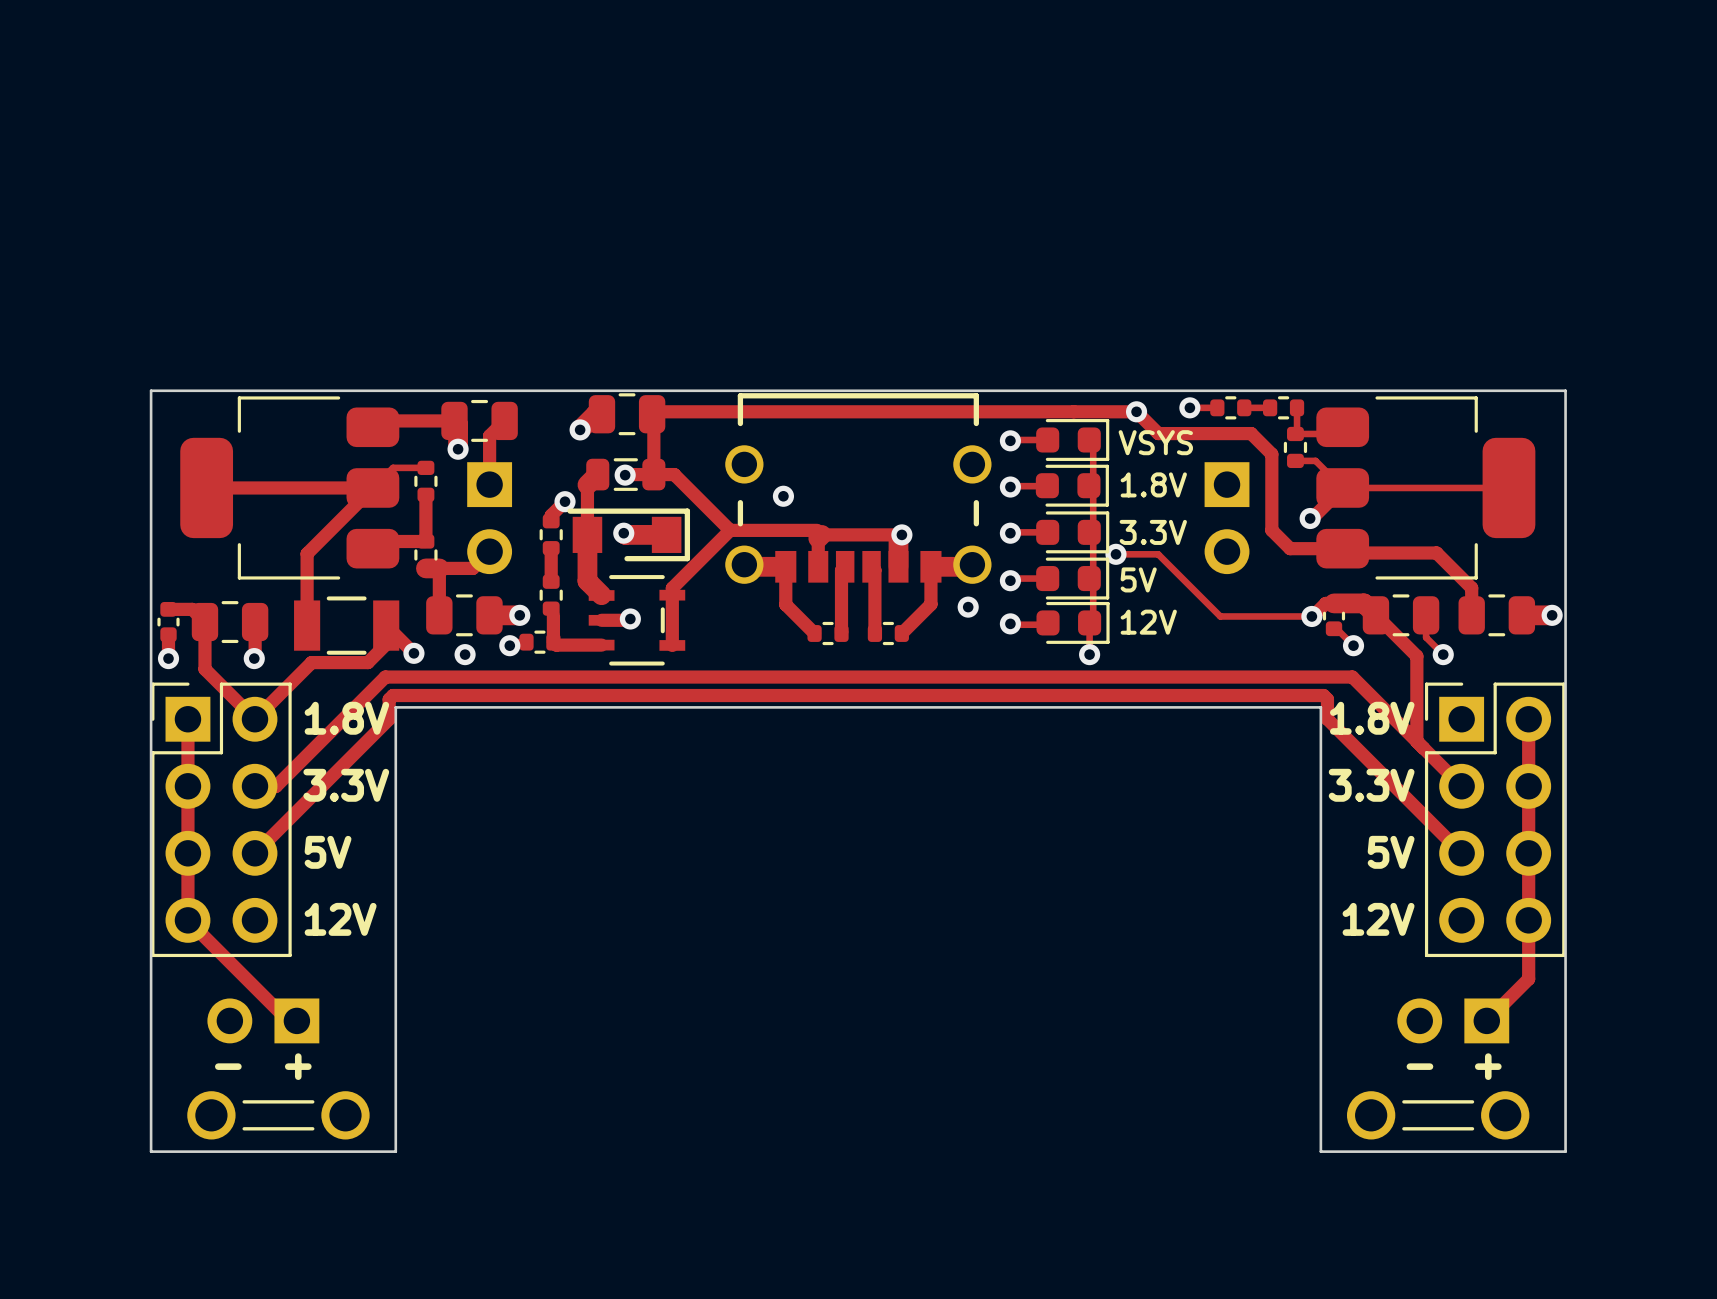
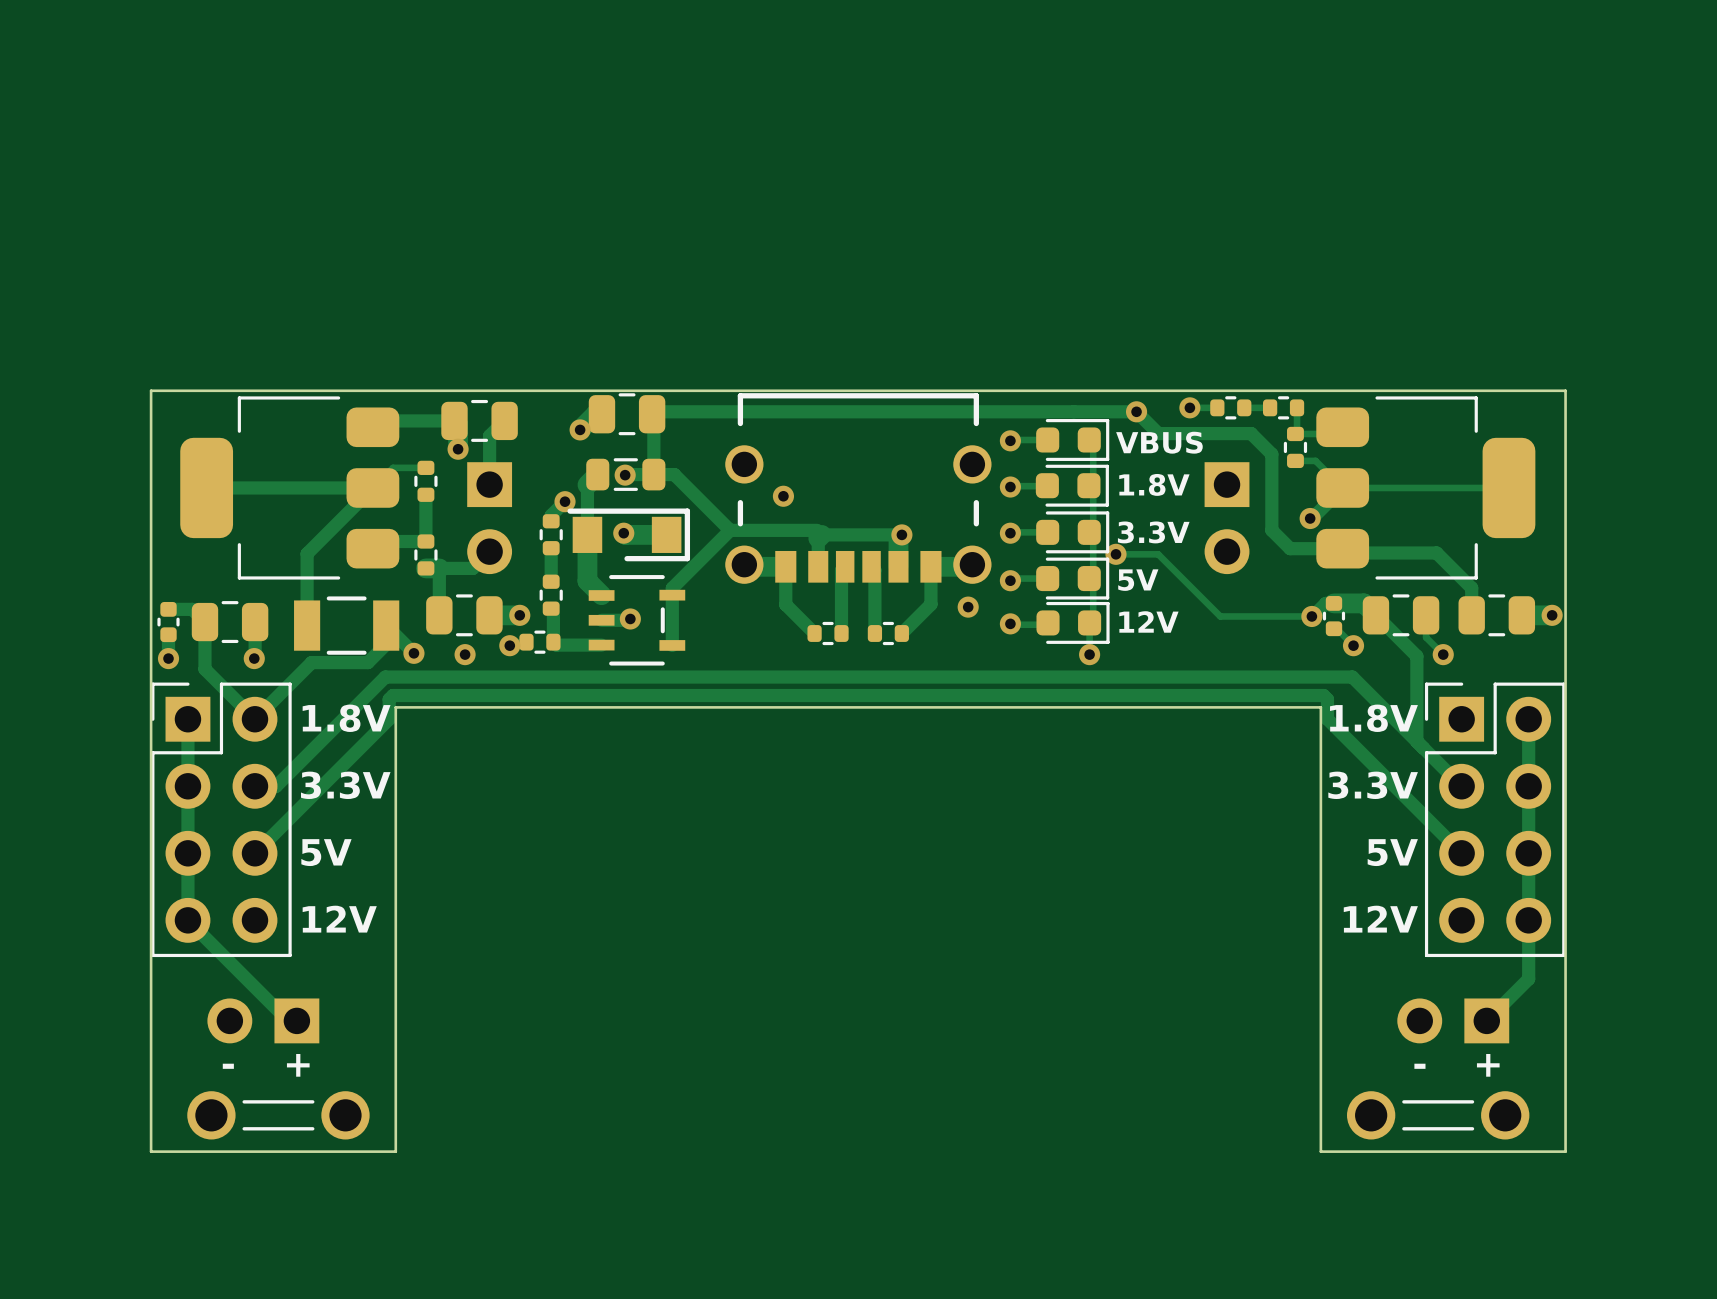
text: VSYS (1155, 442) -> VBUS (1159, 442)

